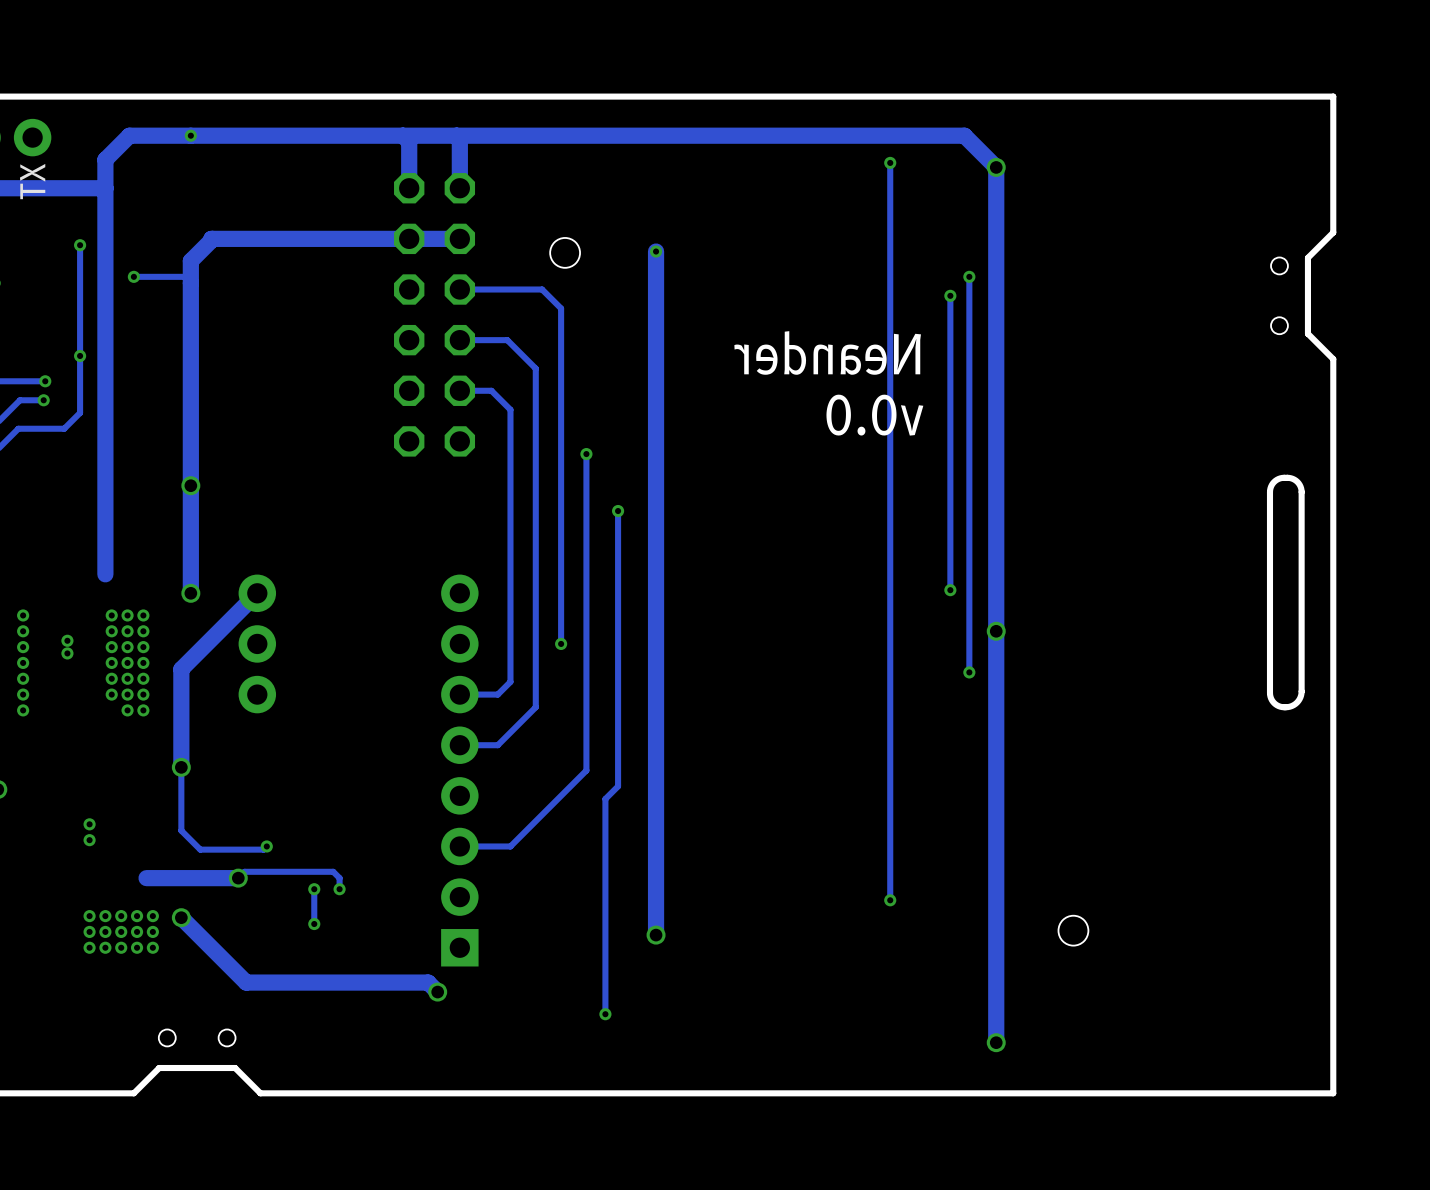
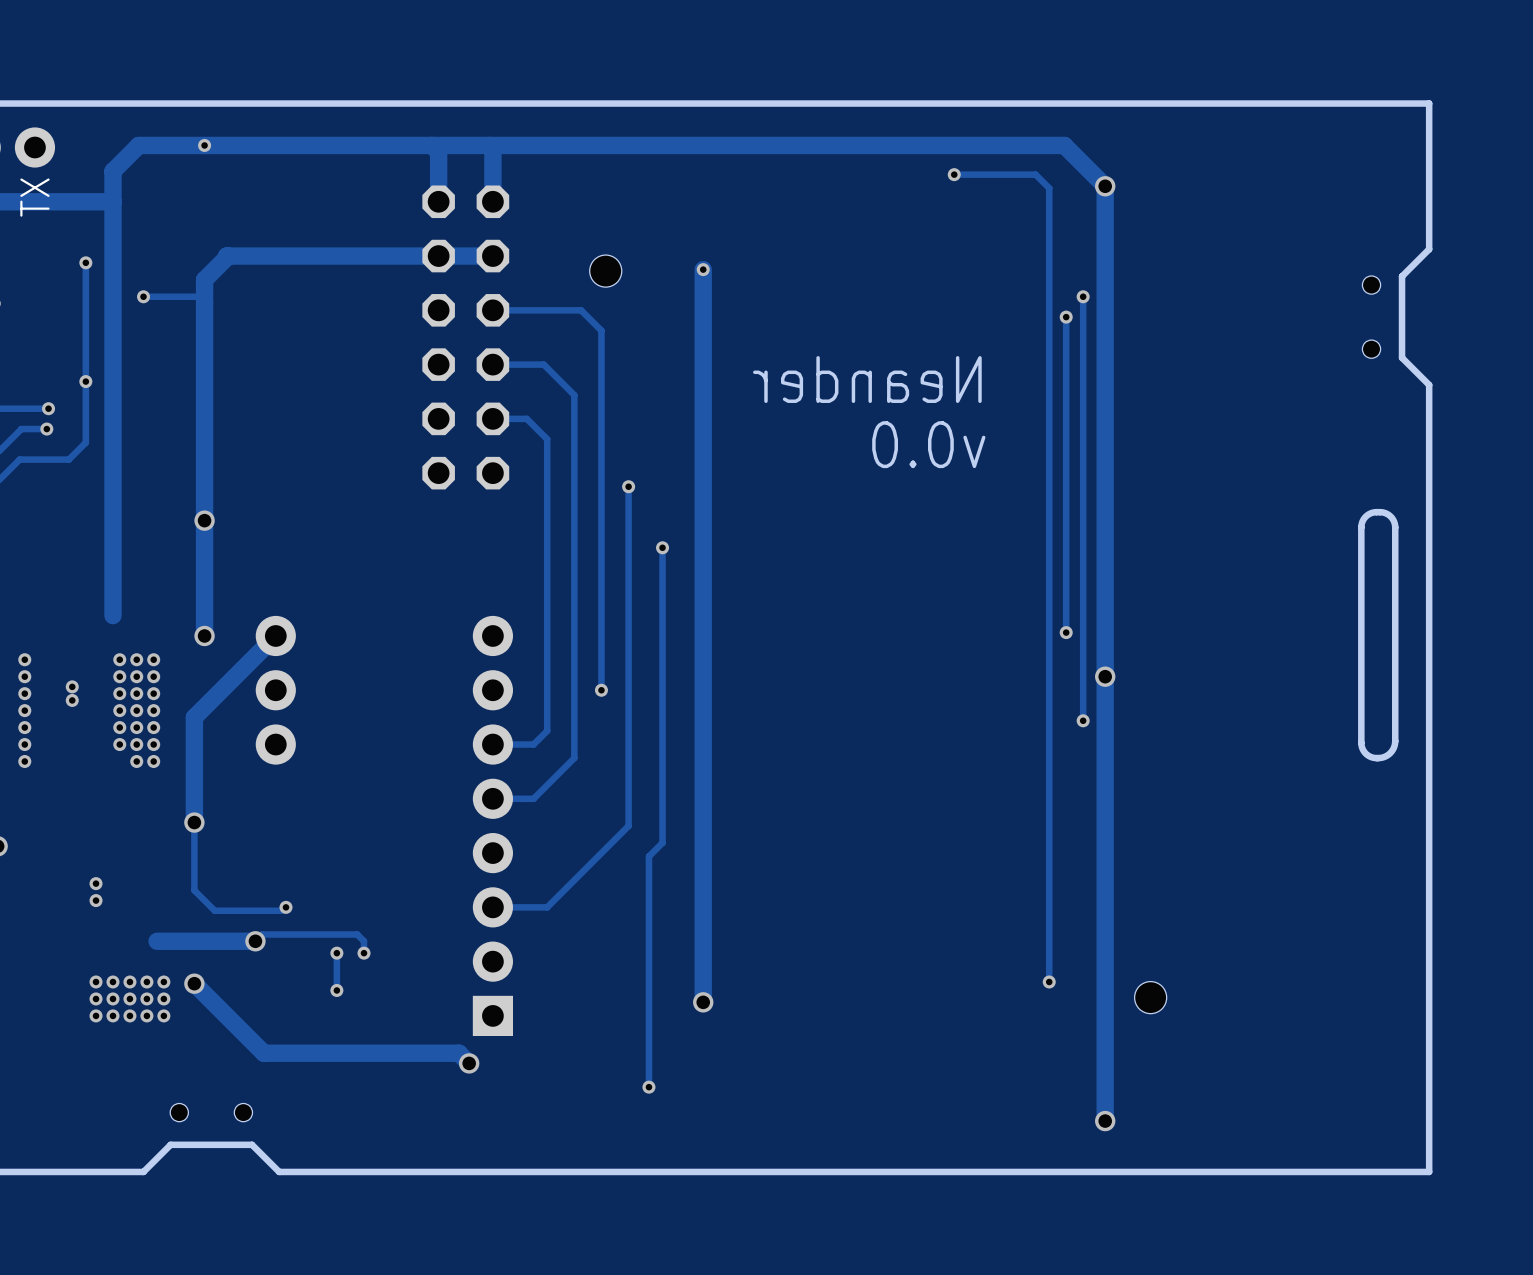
track: (964, 135) (996, 167) (996, 1042) -> (1033, 145) (1064, 145) (1105, 186) (1105, 1121)
track: (890, 162) (890, 900) -> (954, 174) (1035, 174) (1049, 188) (1049, 981)
via position: (996, 167) -> (1105, 186)
track: (969, 276) (969, 672) -> (1083, 296) (1083, 720)
via: (969, 276) -> none
via: none -> (1083, 296)
track: (950, 295) (950, 590) -> (1066, 317) (1066, 632)
via: (950, 295) -> none
via: none -> (1066, 317)
via: (950, 590) -> none
via: none -> (1066, 632)
via position: (996, 631) -> (1105, 676)
via position: (969, 672) -> (1083, 720)
via position: (890, 900) -> (1049, 981)
via position: (996, 1042) -> (1105, 1121)

